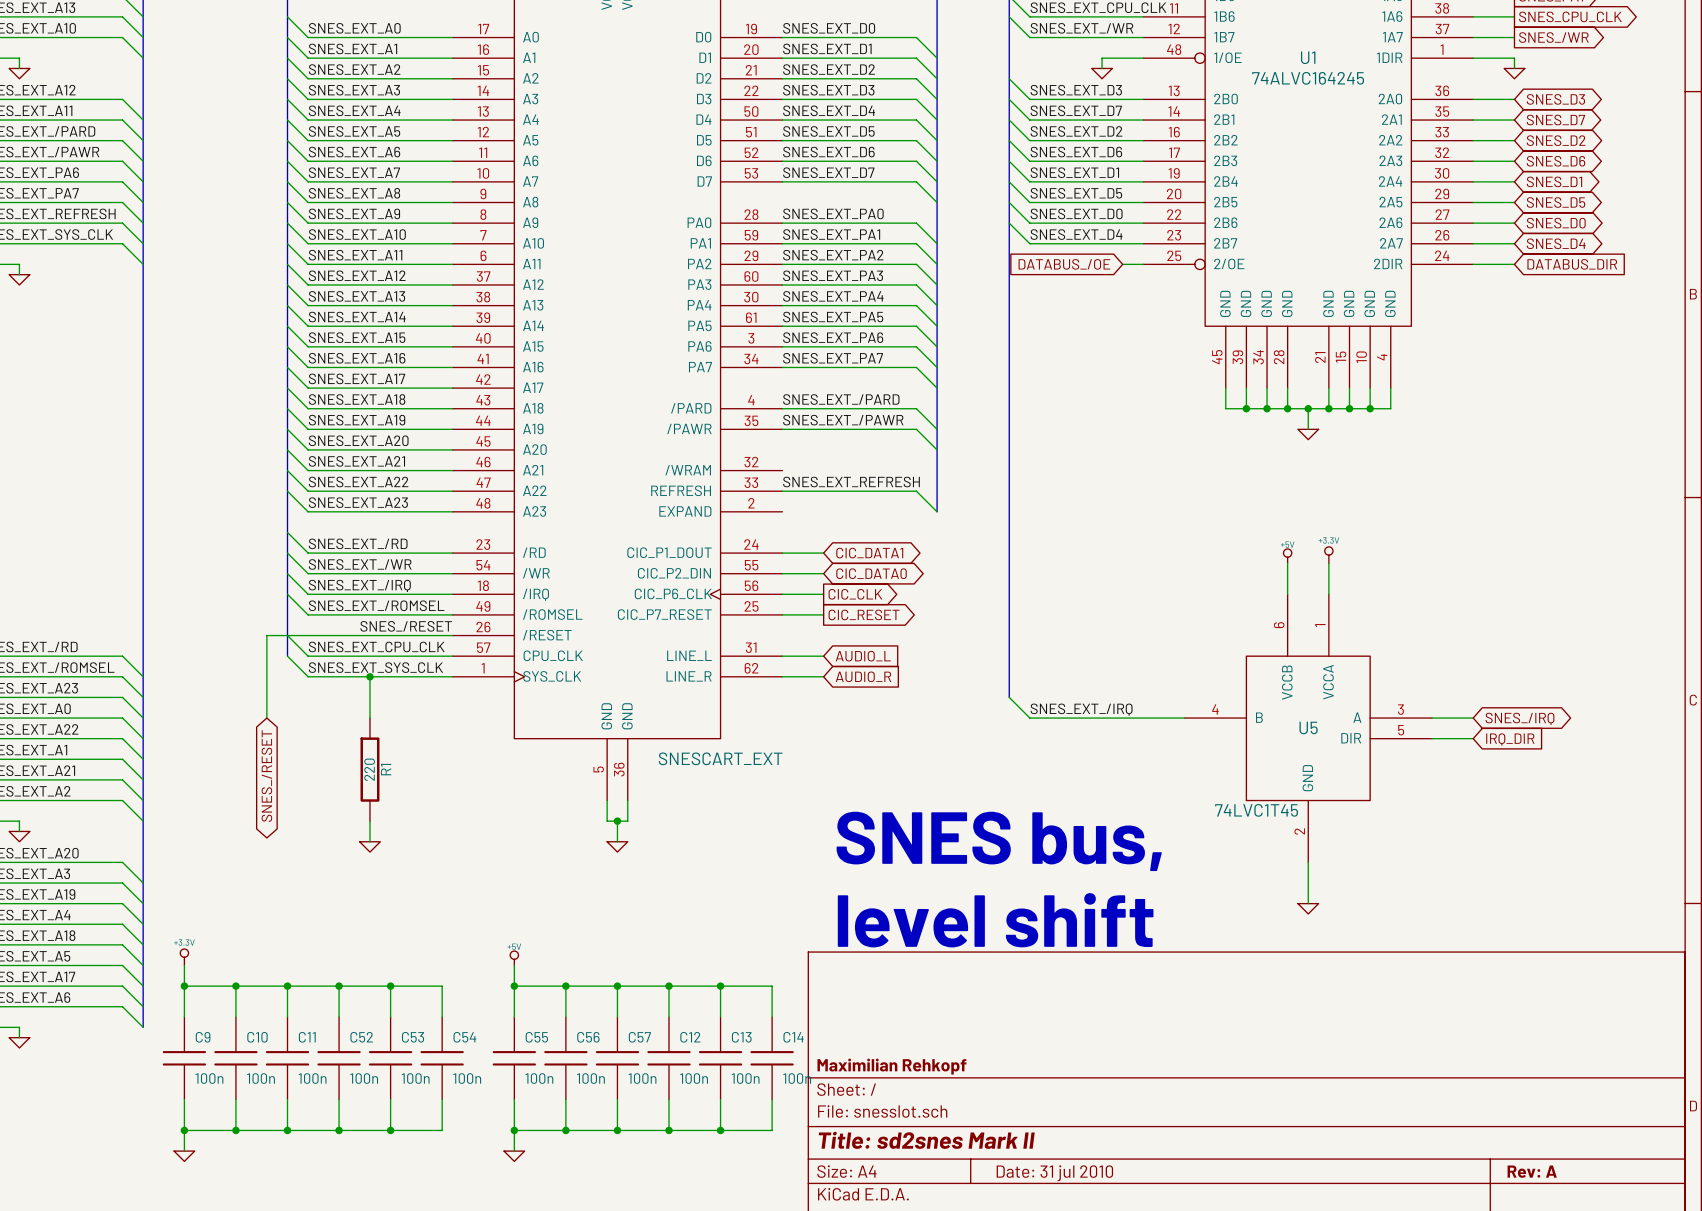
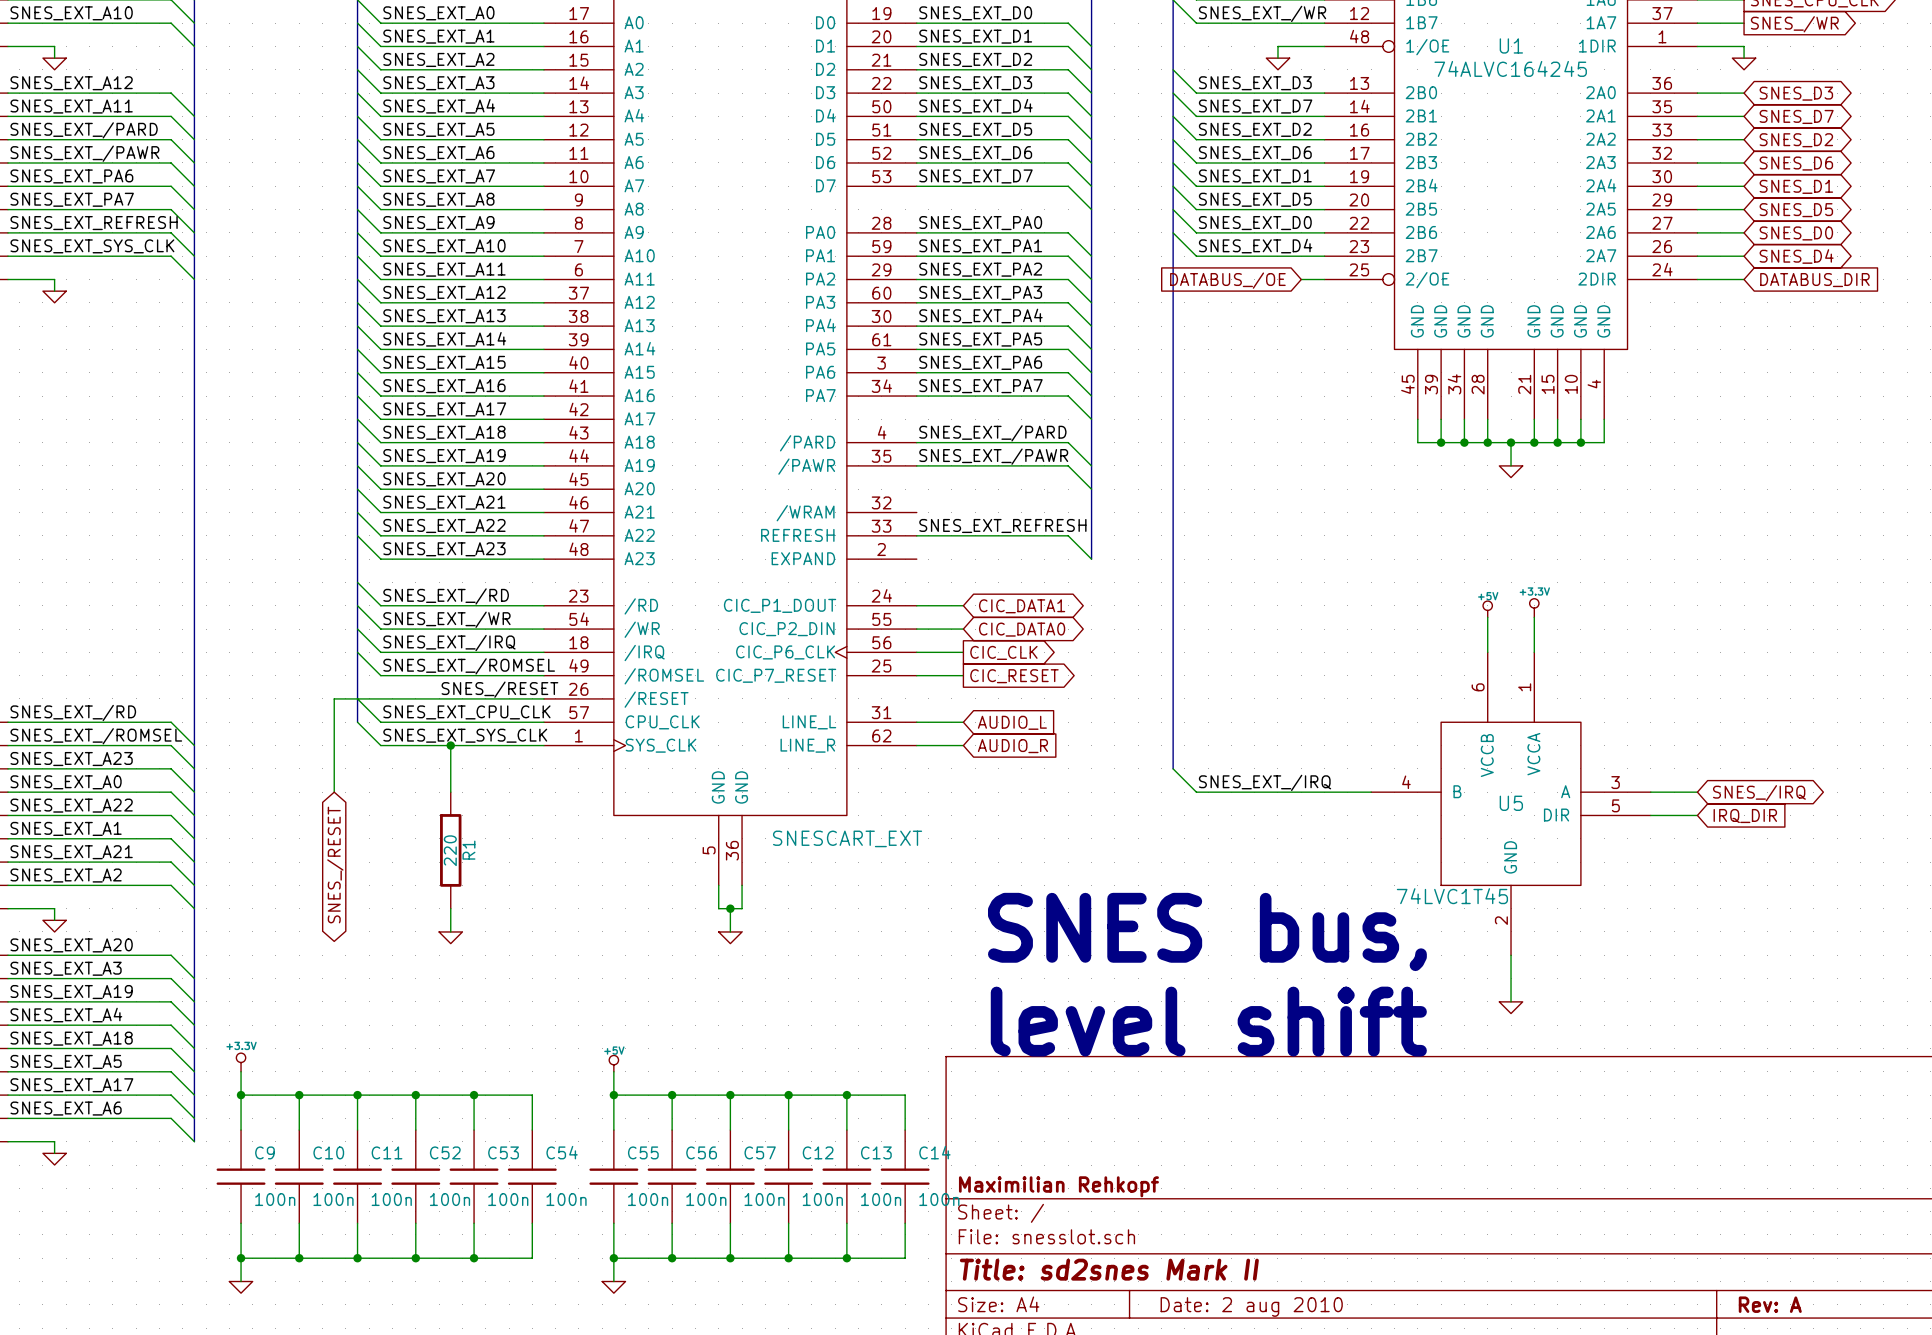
title block: Date: 31 jul 2010 (1054, 1173) -> Date: 2 aug 2010 (1251, 1306)

